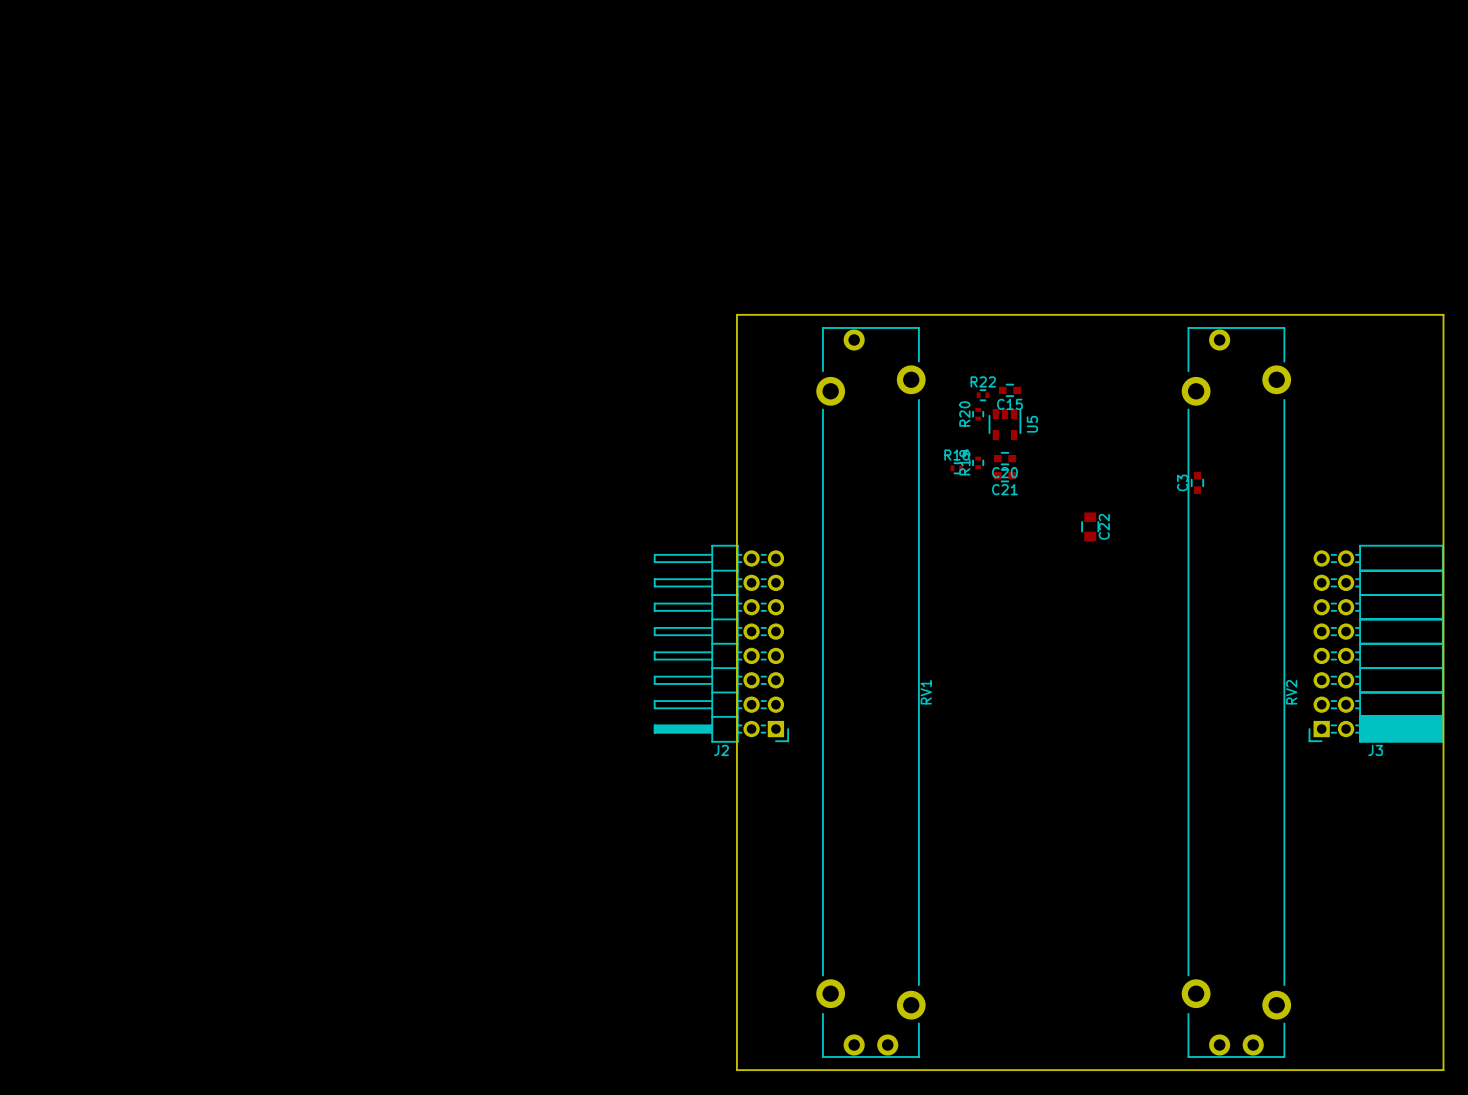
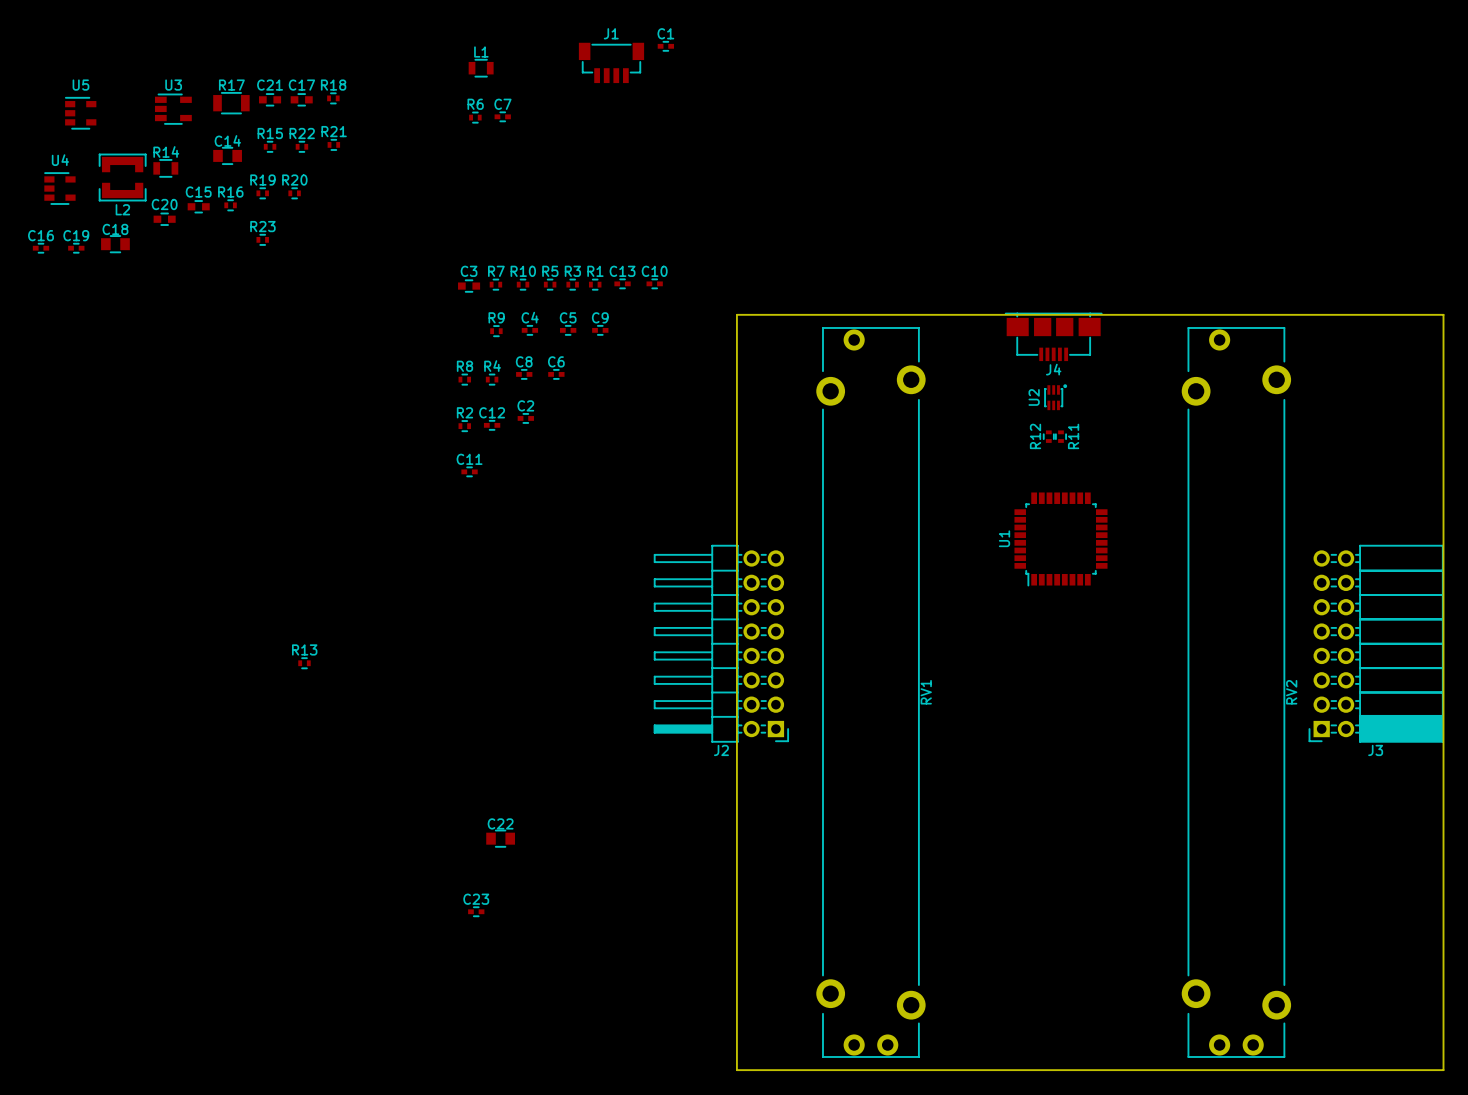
C1: none -> (665, 46)
J1: none -> (611, 62)
L1: none -> (481, 68)
R18: none -> (333, 98)
C17: none -> (301, 99)
R17: none -> (231, 103)
U3: none -> (173, 109)
C7: none -> (502, 116)
R6: none -> (475, 117)
R21: none -> (333, 144)
R15: none -> (270, 146)
C14: none -> (227, 155)
R14: none -> (165, 168)
L2: none -> (122, 177)
U4: none -> (59, 188)
R23: none -> (262, 239)
C18: none -> (115, 244)
C16: none -> (41, 248)
C19: none -> (76, 248)
C13: none -> (622, 283)
C10: none -> (654, 283)
R7: none -> (495, 284)
R10: none -> (523, 284)
R5: none -> (550, 284)
R3: none -> (572, 284)
R1: none -> (595, 284)
C4: none -> (529, 330)
C5: none -> (568, 330)
C9: none -> (600, 330)
R9: none -> (496, 331)
J4: none -> (1053, 336)
C8: none -> (524, 374)
C6: none -> (556, 374)
R8: none -> (464, 379)
R4: none -> (492, 379)
C15 position: (1009, 390) -> (198, 206)
R22 position: (983, 395) -> (301, 146)
U2: none -> (1055, 397)
C15 name position: C15 (1009, 404) -> C15 (198, 192)
R20 rotation: 0° (978, 414) -> 90° clockwise (294, 193)
R20 position: (978, 414) -> (294, 193)
C2: none -> (525, 418)
U5 rotation: 0° (1004, 424) -> 90° counterclockwise (80, 113)
U5 position: (1004, 424) -> (80, 113)
C12: none -> (492, 425)
R2: none -> (464, 426)
R12: none -> (1048, 436)
R11: none -> (1060, 436)
C20 position: (1004, 458) -> (164, 219)
R19 rotation: 0° (978, 462) -> 90° clockwise (262, 193)
R19 position: (978, 462) -> (262, 193)
R16 position: (956, 468) -> (230, 205)
C11: none -> (469, 471)
C20 name position: C20 (1004, 472) -> C20 (164, 204)
C21 position: (1004, 475) -> (270, 99)
C3 rotation: 0° (1197, 482) -> 90° clockwise (469, 286)
C3 position: (1197, 482) -> (469, 286)
C21 name position: C21 (1004, 489) -> C21 (270, 85)
C22 rotation: 0° (1090, 526) -> 90° clockwise (500, 838)
C22 position: (1090, 526) -> (500, 838)
C22 name position: C22 (1104, 526) -> C22 (500, 823)
U1: none -> (1060, 539)
R13: none -> (304, 663)
C23: none -> (476, 911)

